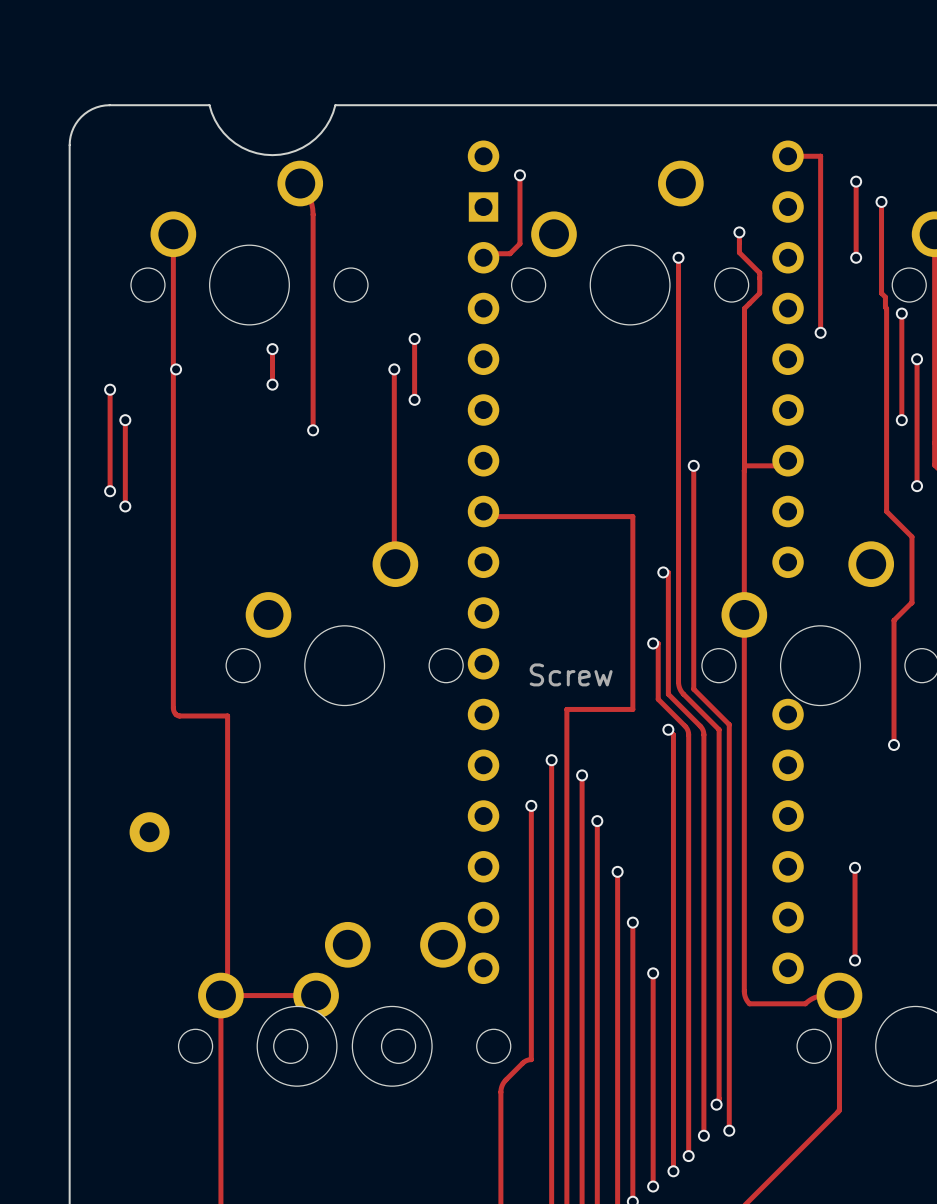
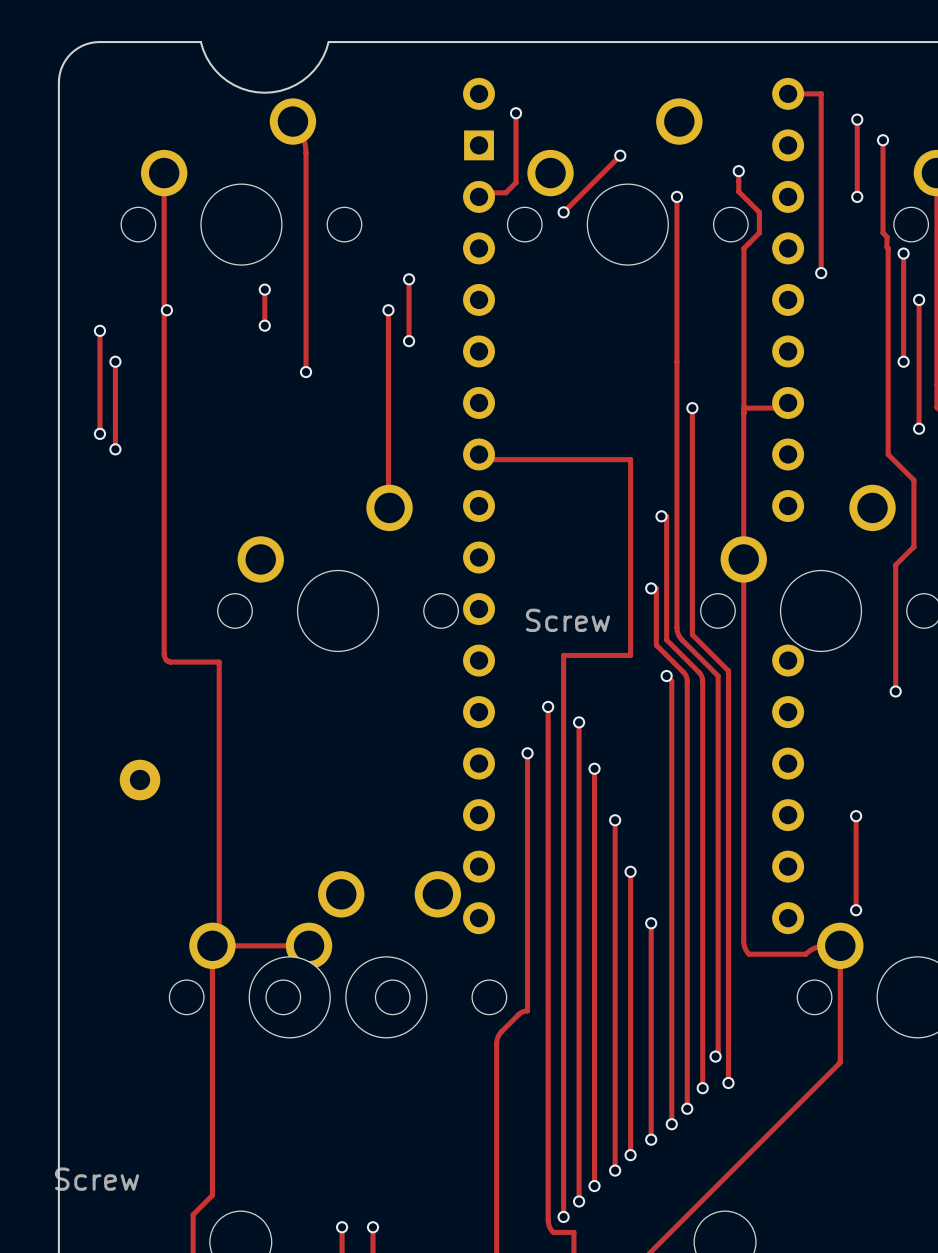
track: none -> (620, 155) (563, 212)
via: none -> (620, 155)
via: none -> (563, 212)

